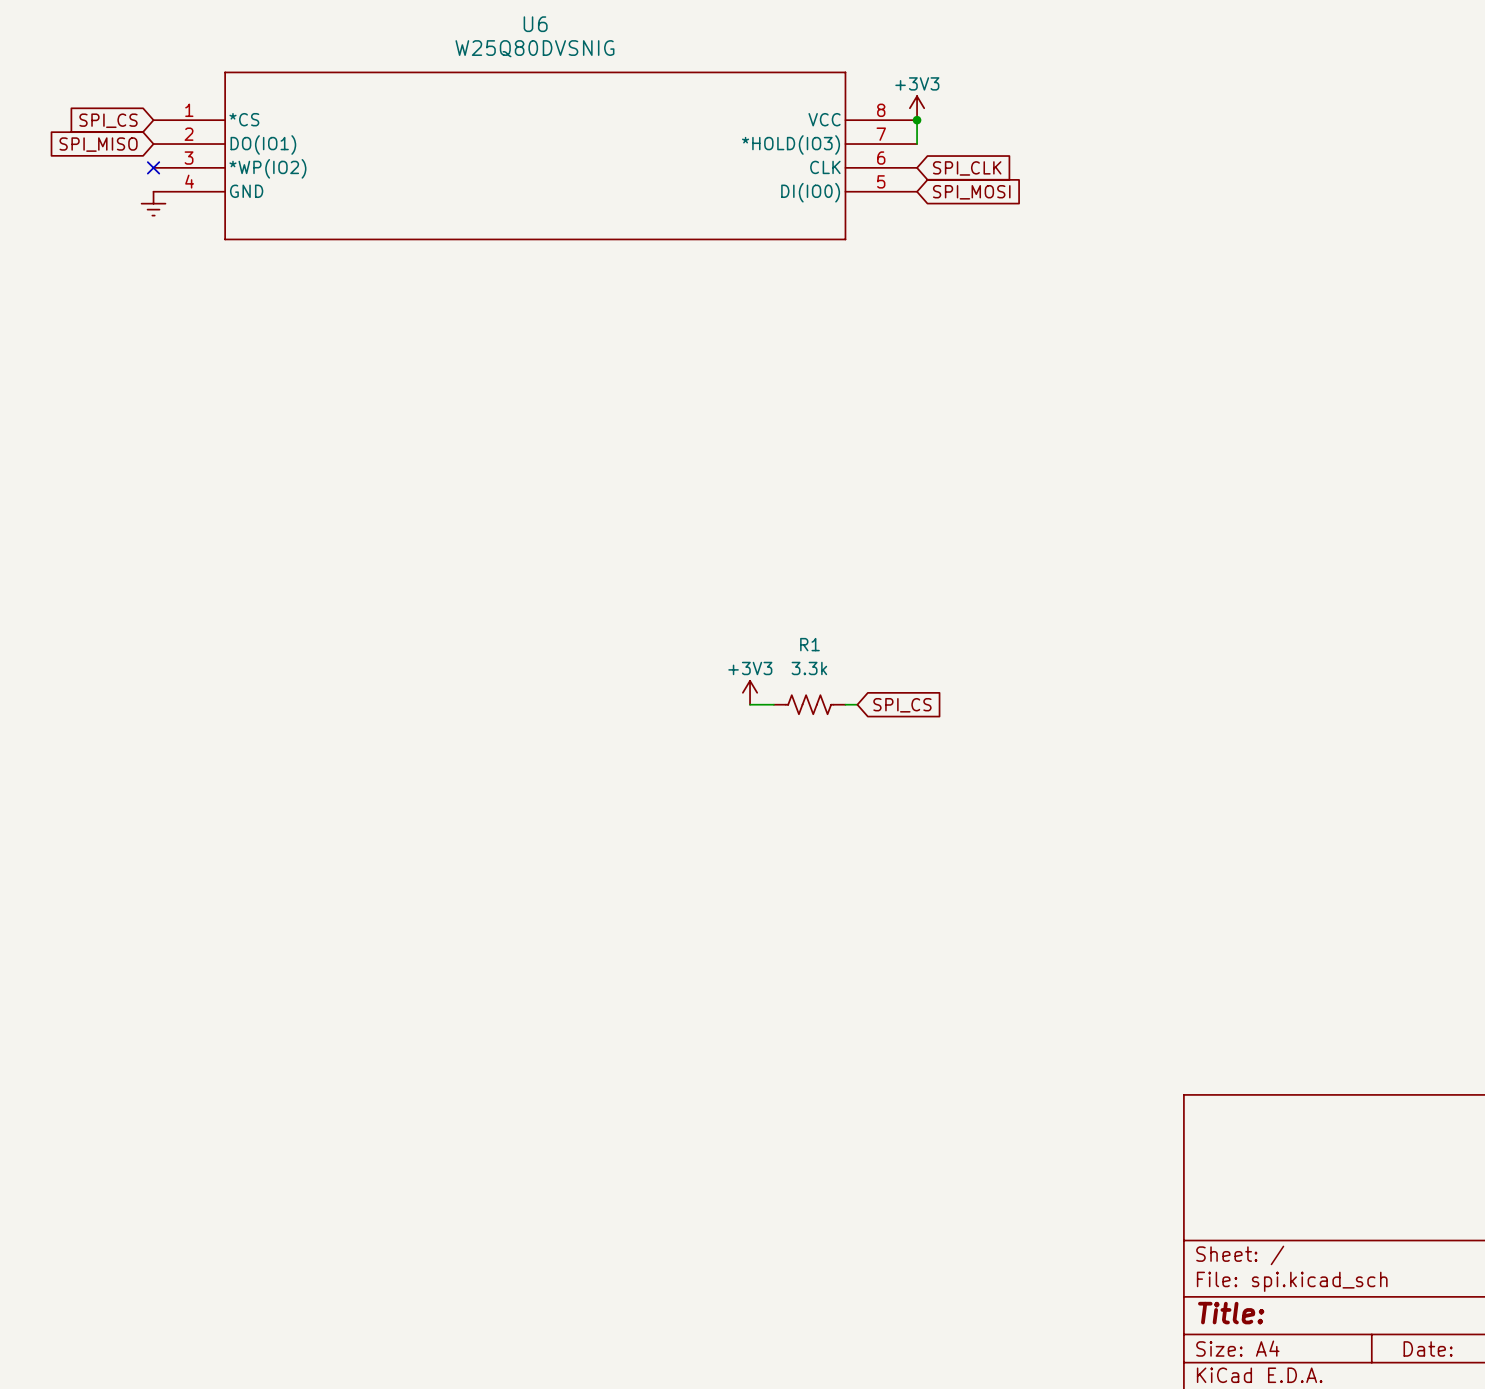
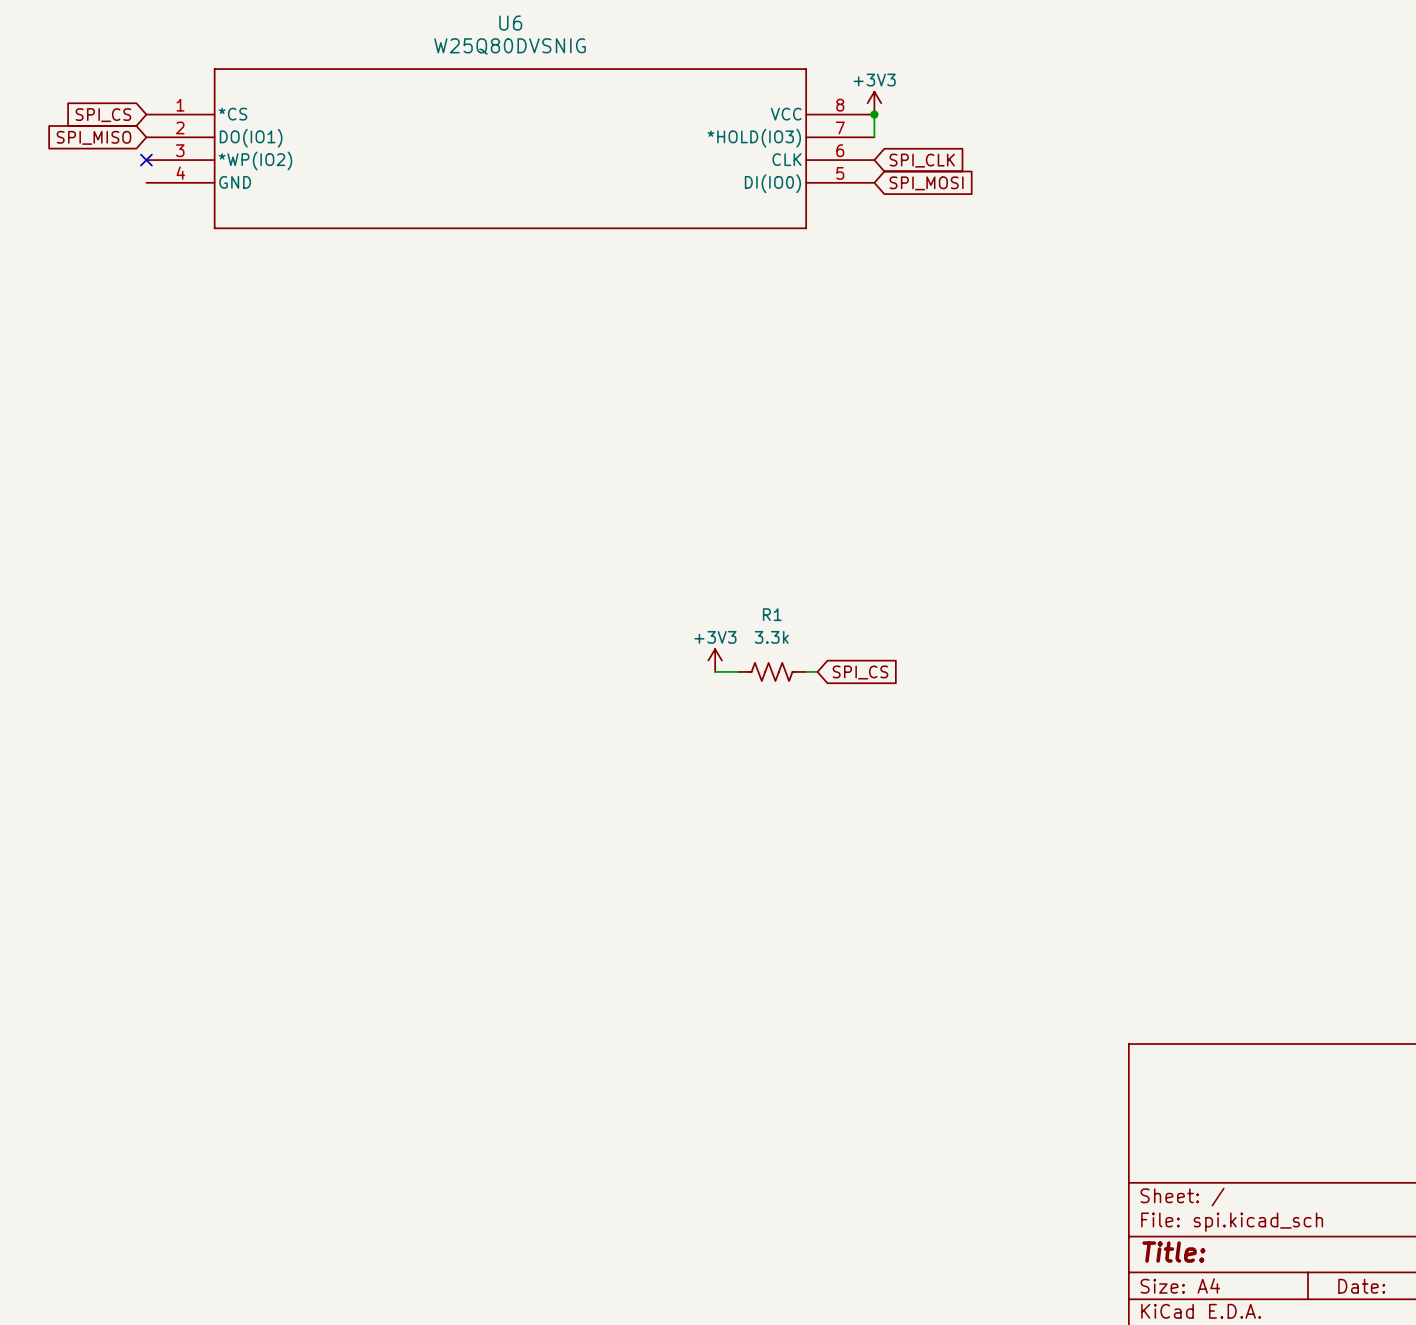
power symbol: (153, 203) -> none

